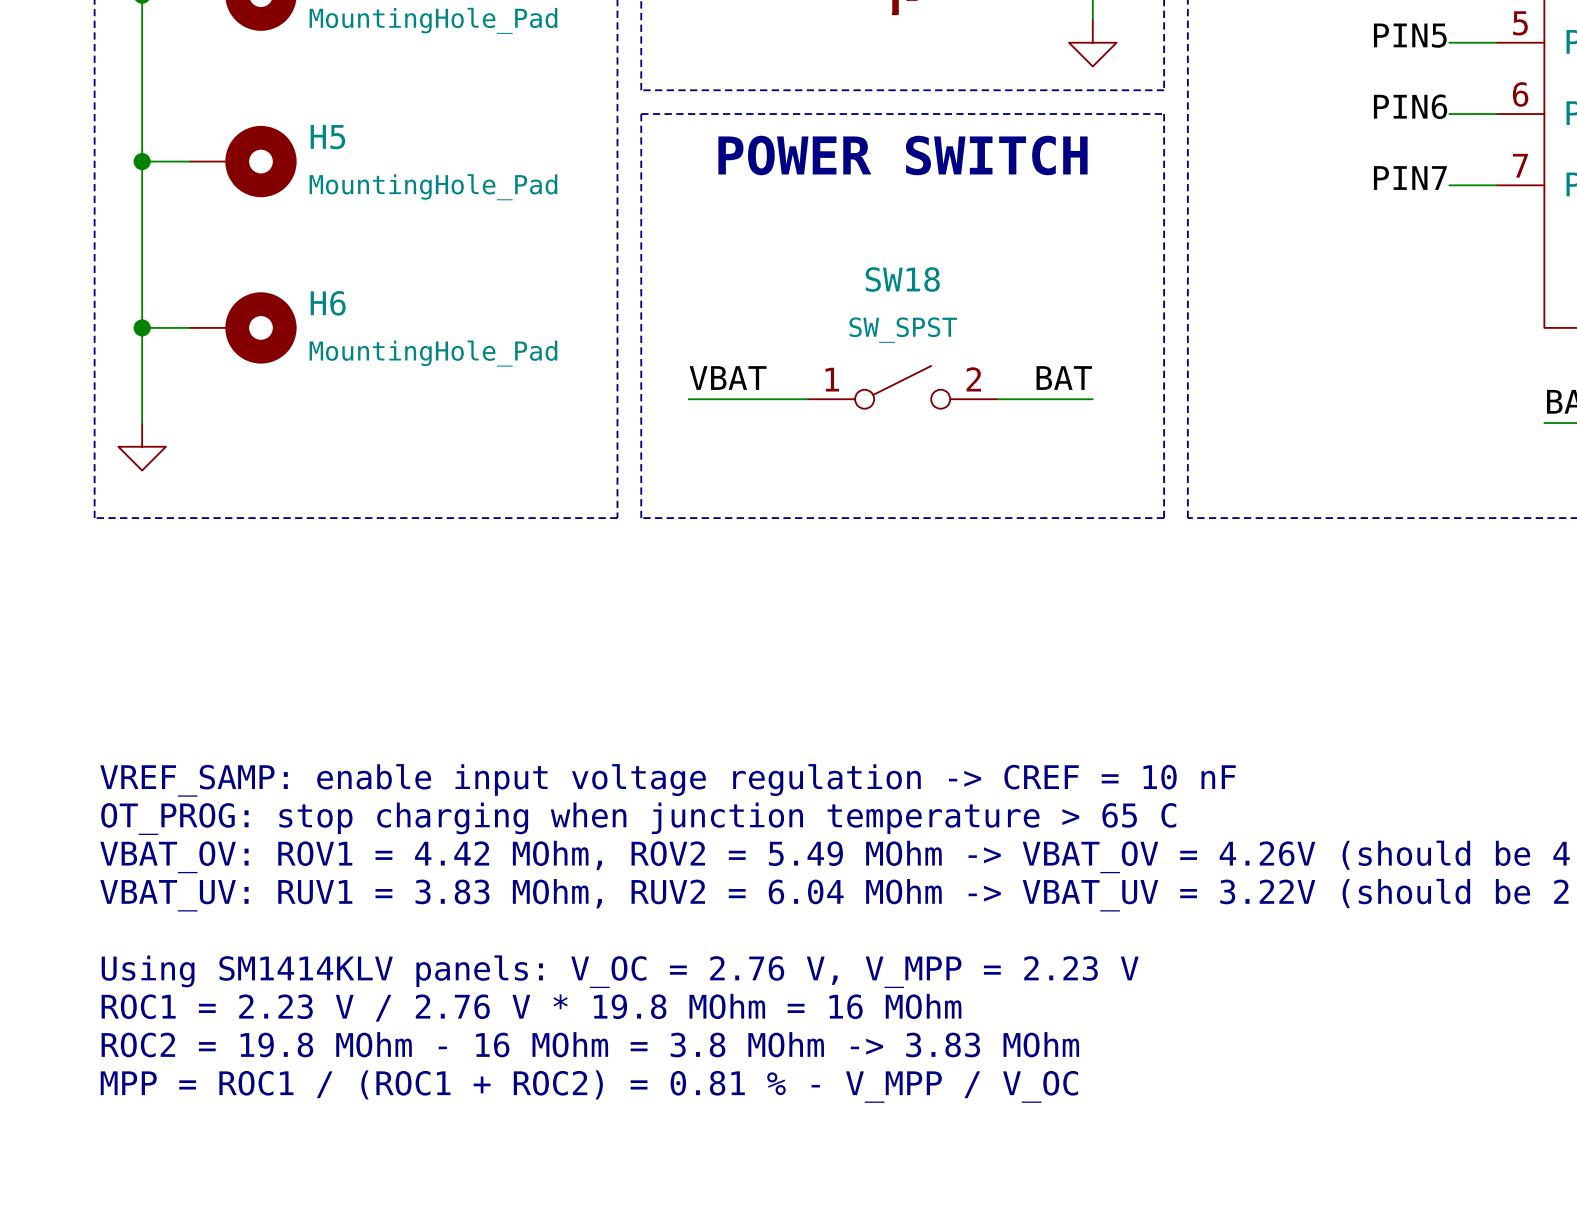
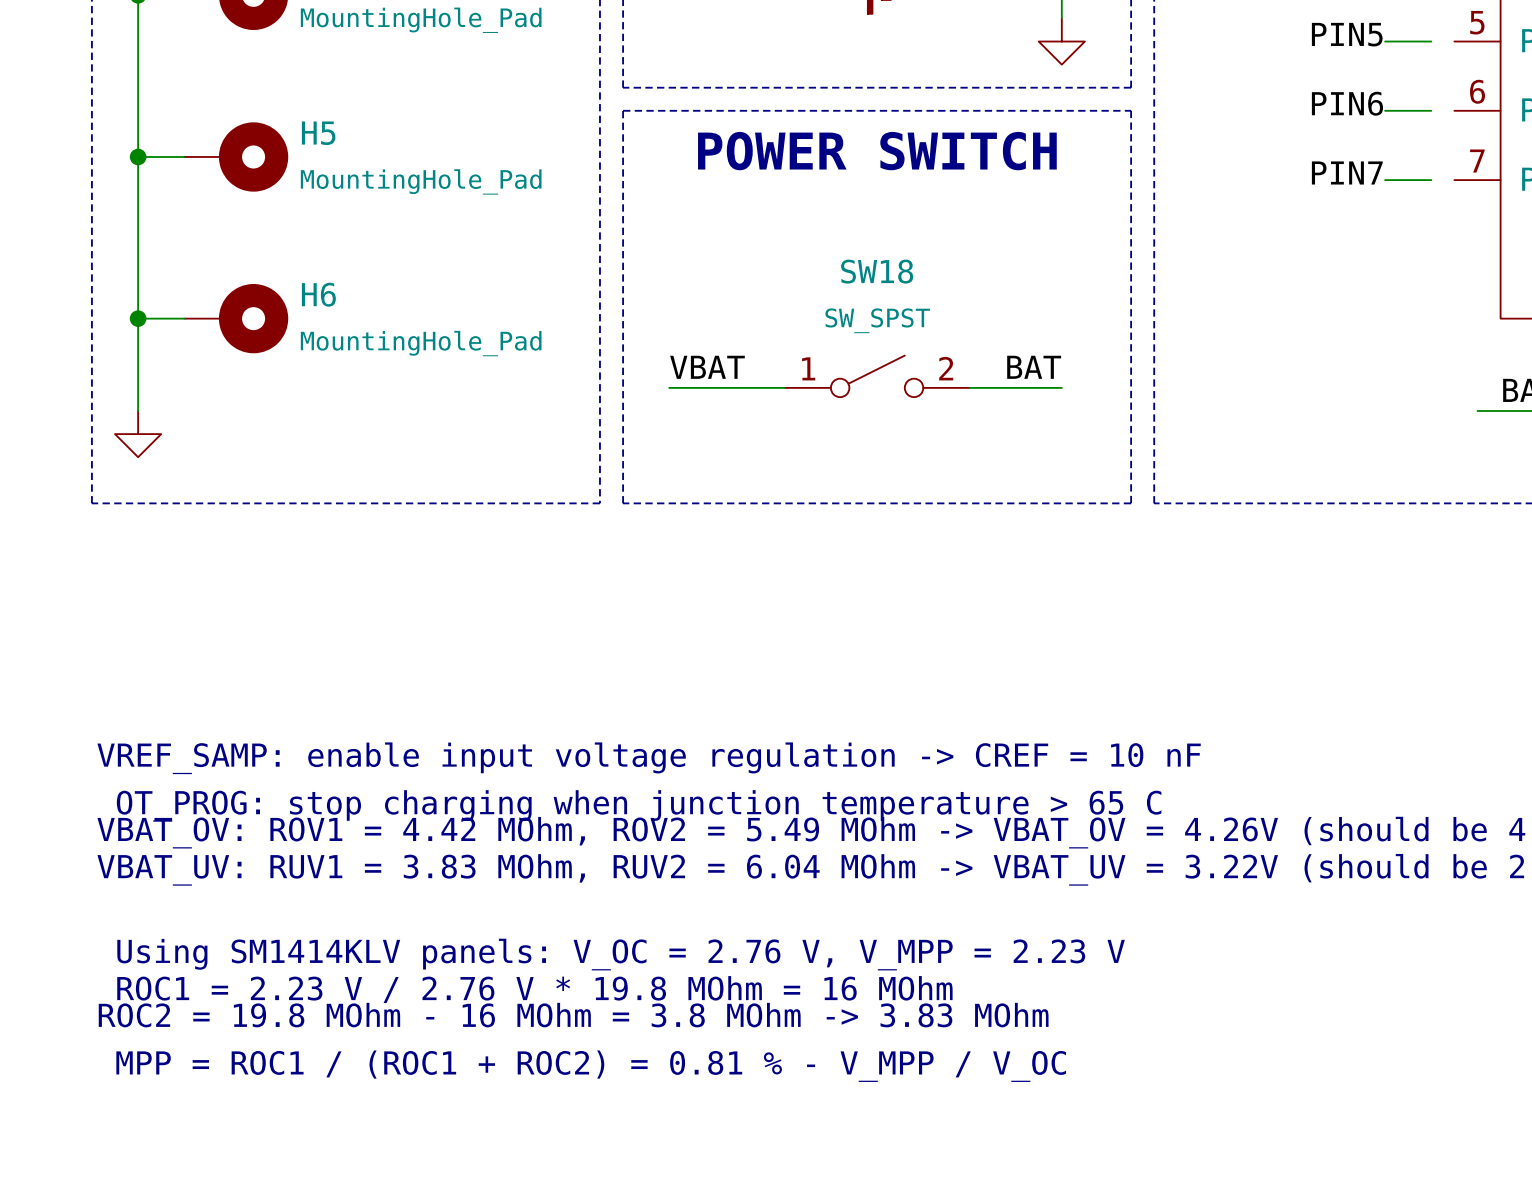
label position: PIN5 (1410, 35) -> PIN5 (1347, 34)
wire: (1473, 42) (1496, 42) -> (1385, 41) (1408, 41)
label position: PIN6 (1410, 106) -> PIN6 (1347, 103)
wire: (1473, 114) (1496, 114) -> (1385, 110) (1408, 110)
label position: PIN7 (1410, 178) -> PIN7 (1347, 172)
wire: (1473, 185) (1496, 185) -> (1385, 180) (1408, 180)
wire: none -> (1477, 411) (1500, 411)
text position: OT_PROG: stop charging when junction temperature > 65 C (638, 818) -> OT_PROG: stop charging when junction temperature > 65 C (639, 805)
text position: Using SM1414KLV panels: V_OC = 2.76 V, V_MPP = 2.23 V (620, 971) -> Using SM1414KLV panels: V_OC = 2.76 V, V_MPP = 2.23 V (621, 954)
text position: ROC1 = 2.23 V / 2.76 V * 19.8 MOhm = 16 MOhm (531, 1007) -> ROC1 = 2.23 V / 2.76 V * 19.8 MOhm = 16 MOhm (534, 989)
text position: MPP = ROC1 / (ROC1 + ROC2) = 0.81 % - V_MPP / V_OC (589, 1086) -> MPP = ROC1 / (ROC1 + ROC2) = 0.81 % - V_MPP / V_OC (591, 1066)

